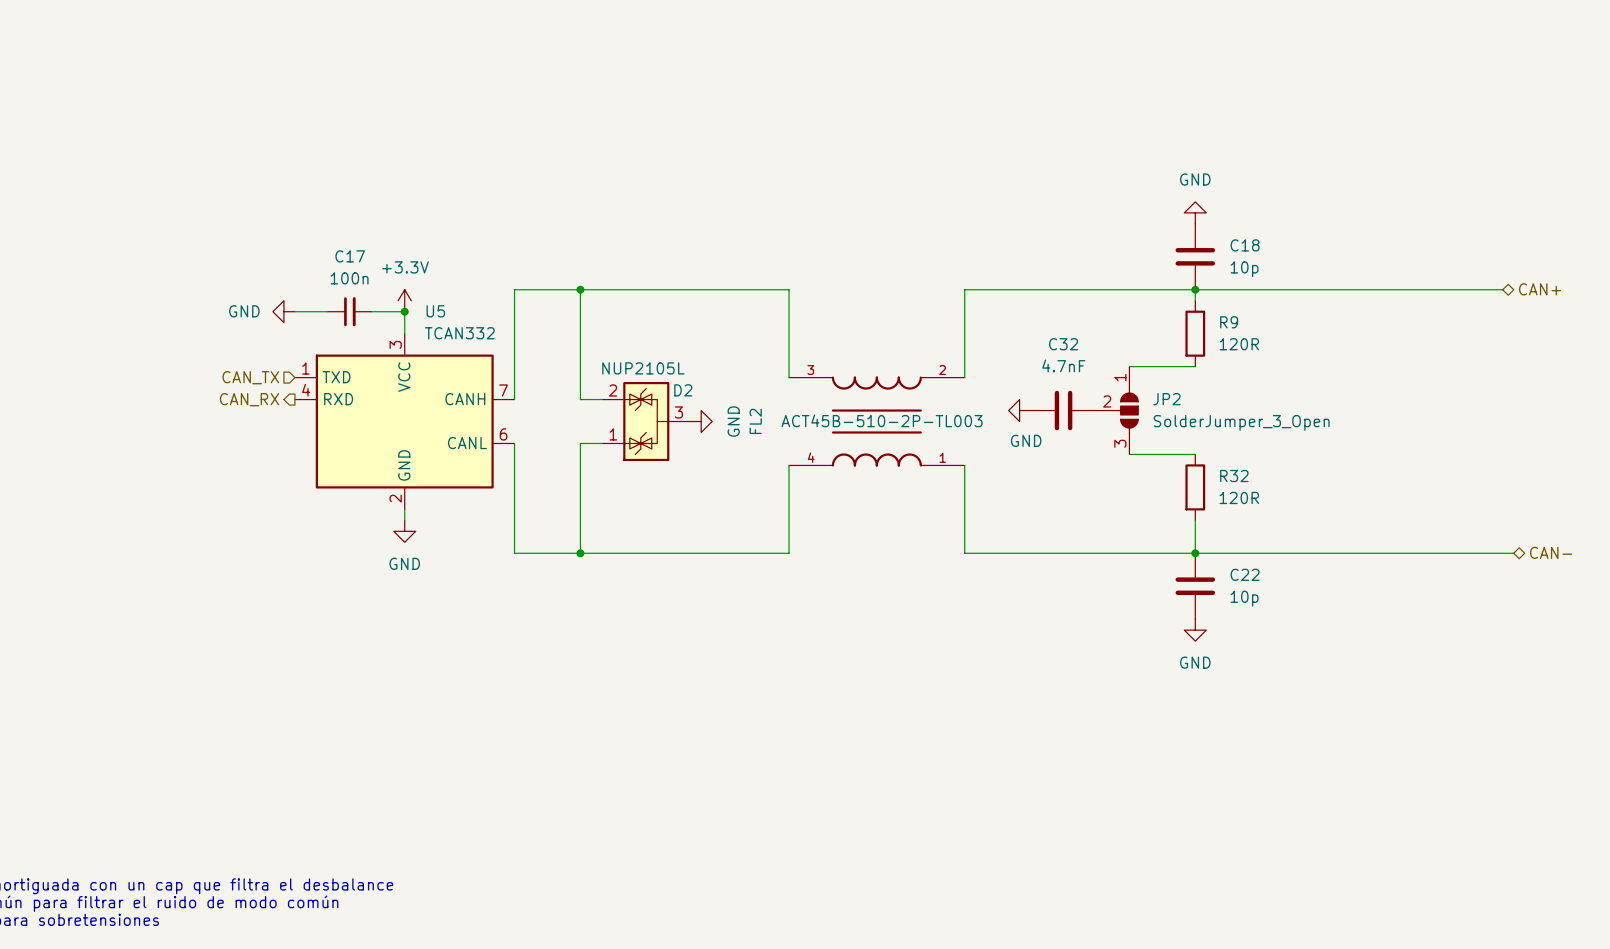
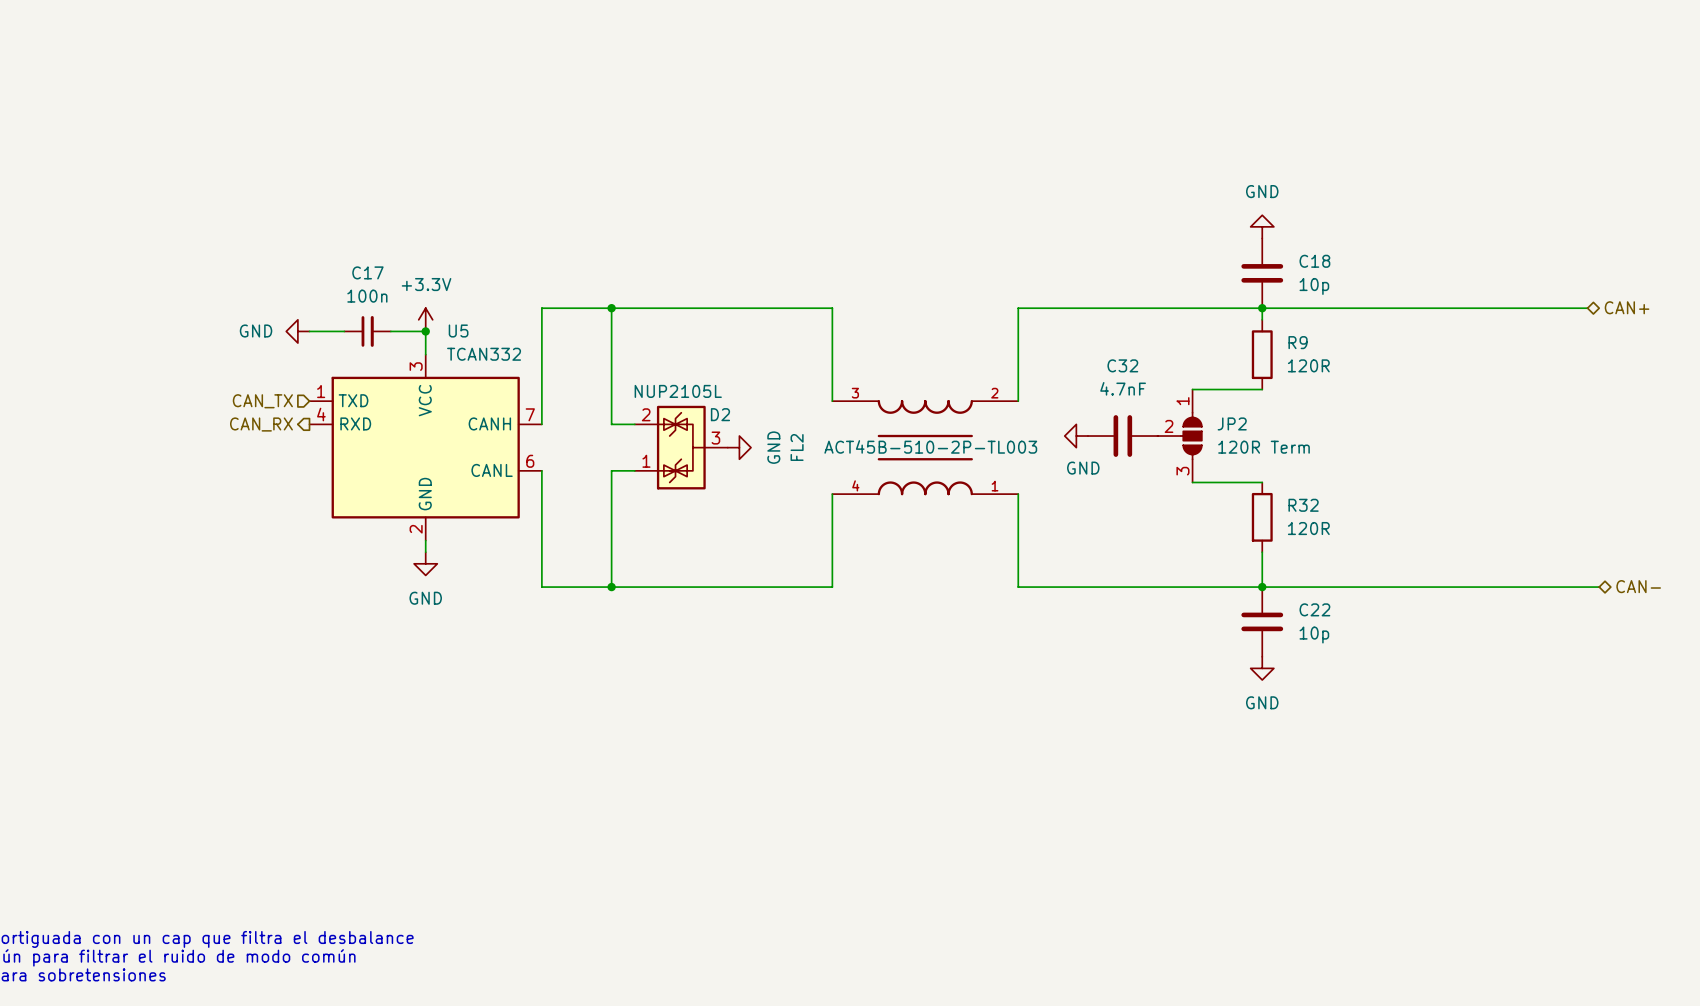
JP2 value: SolderJumper_3_Open (1241, 422) -> 120R Term (1264, 447)

